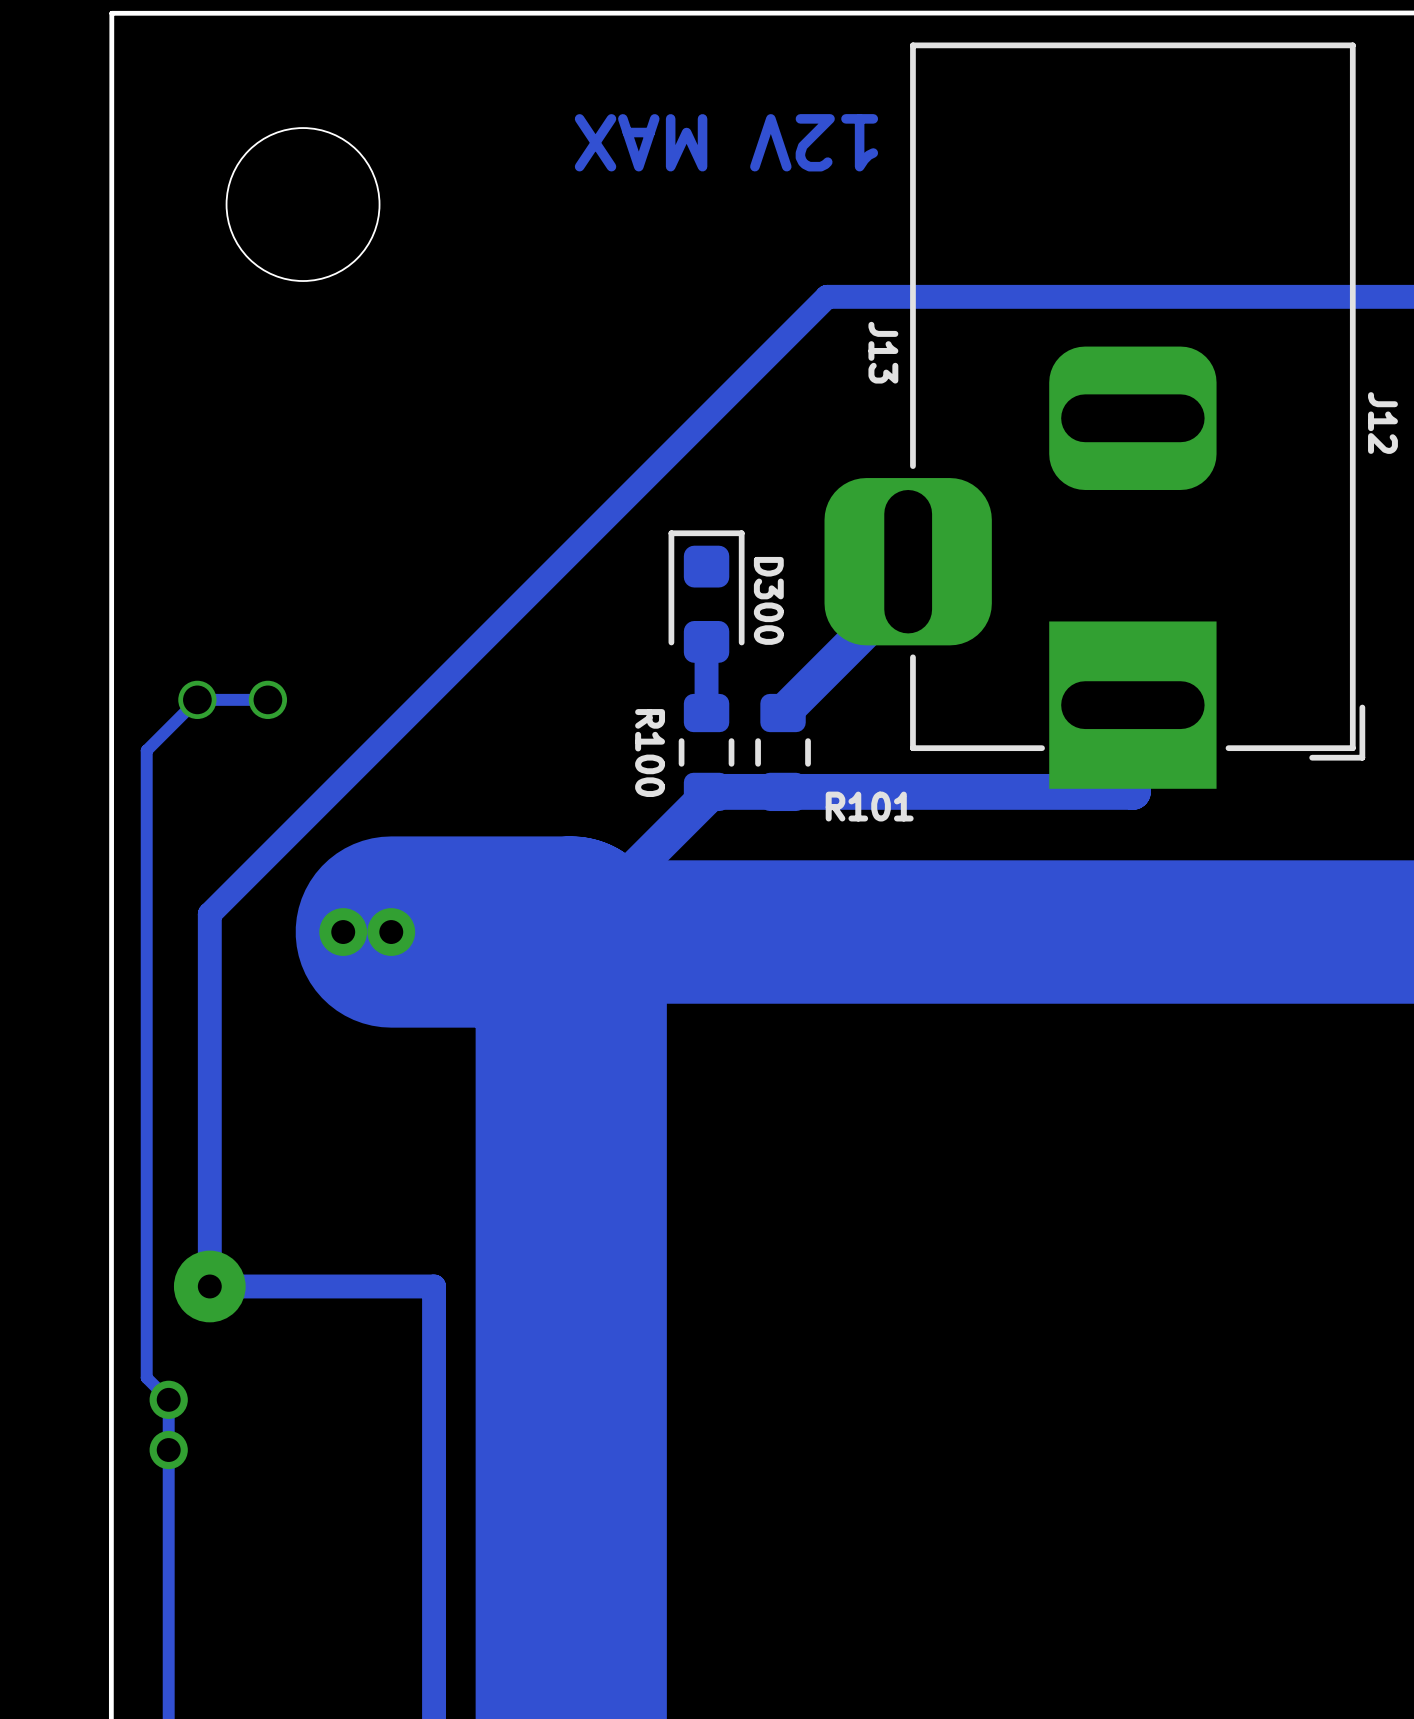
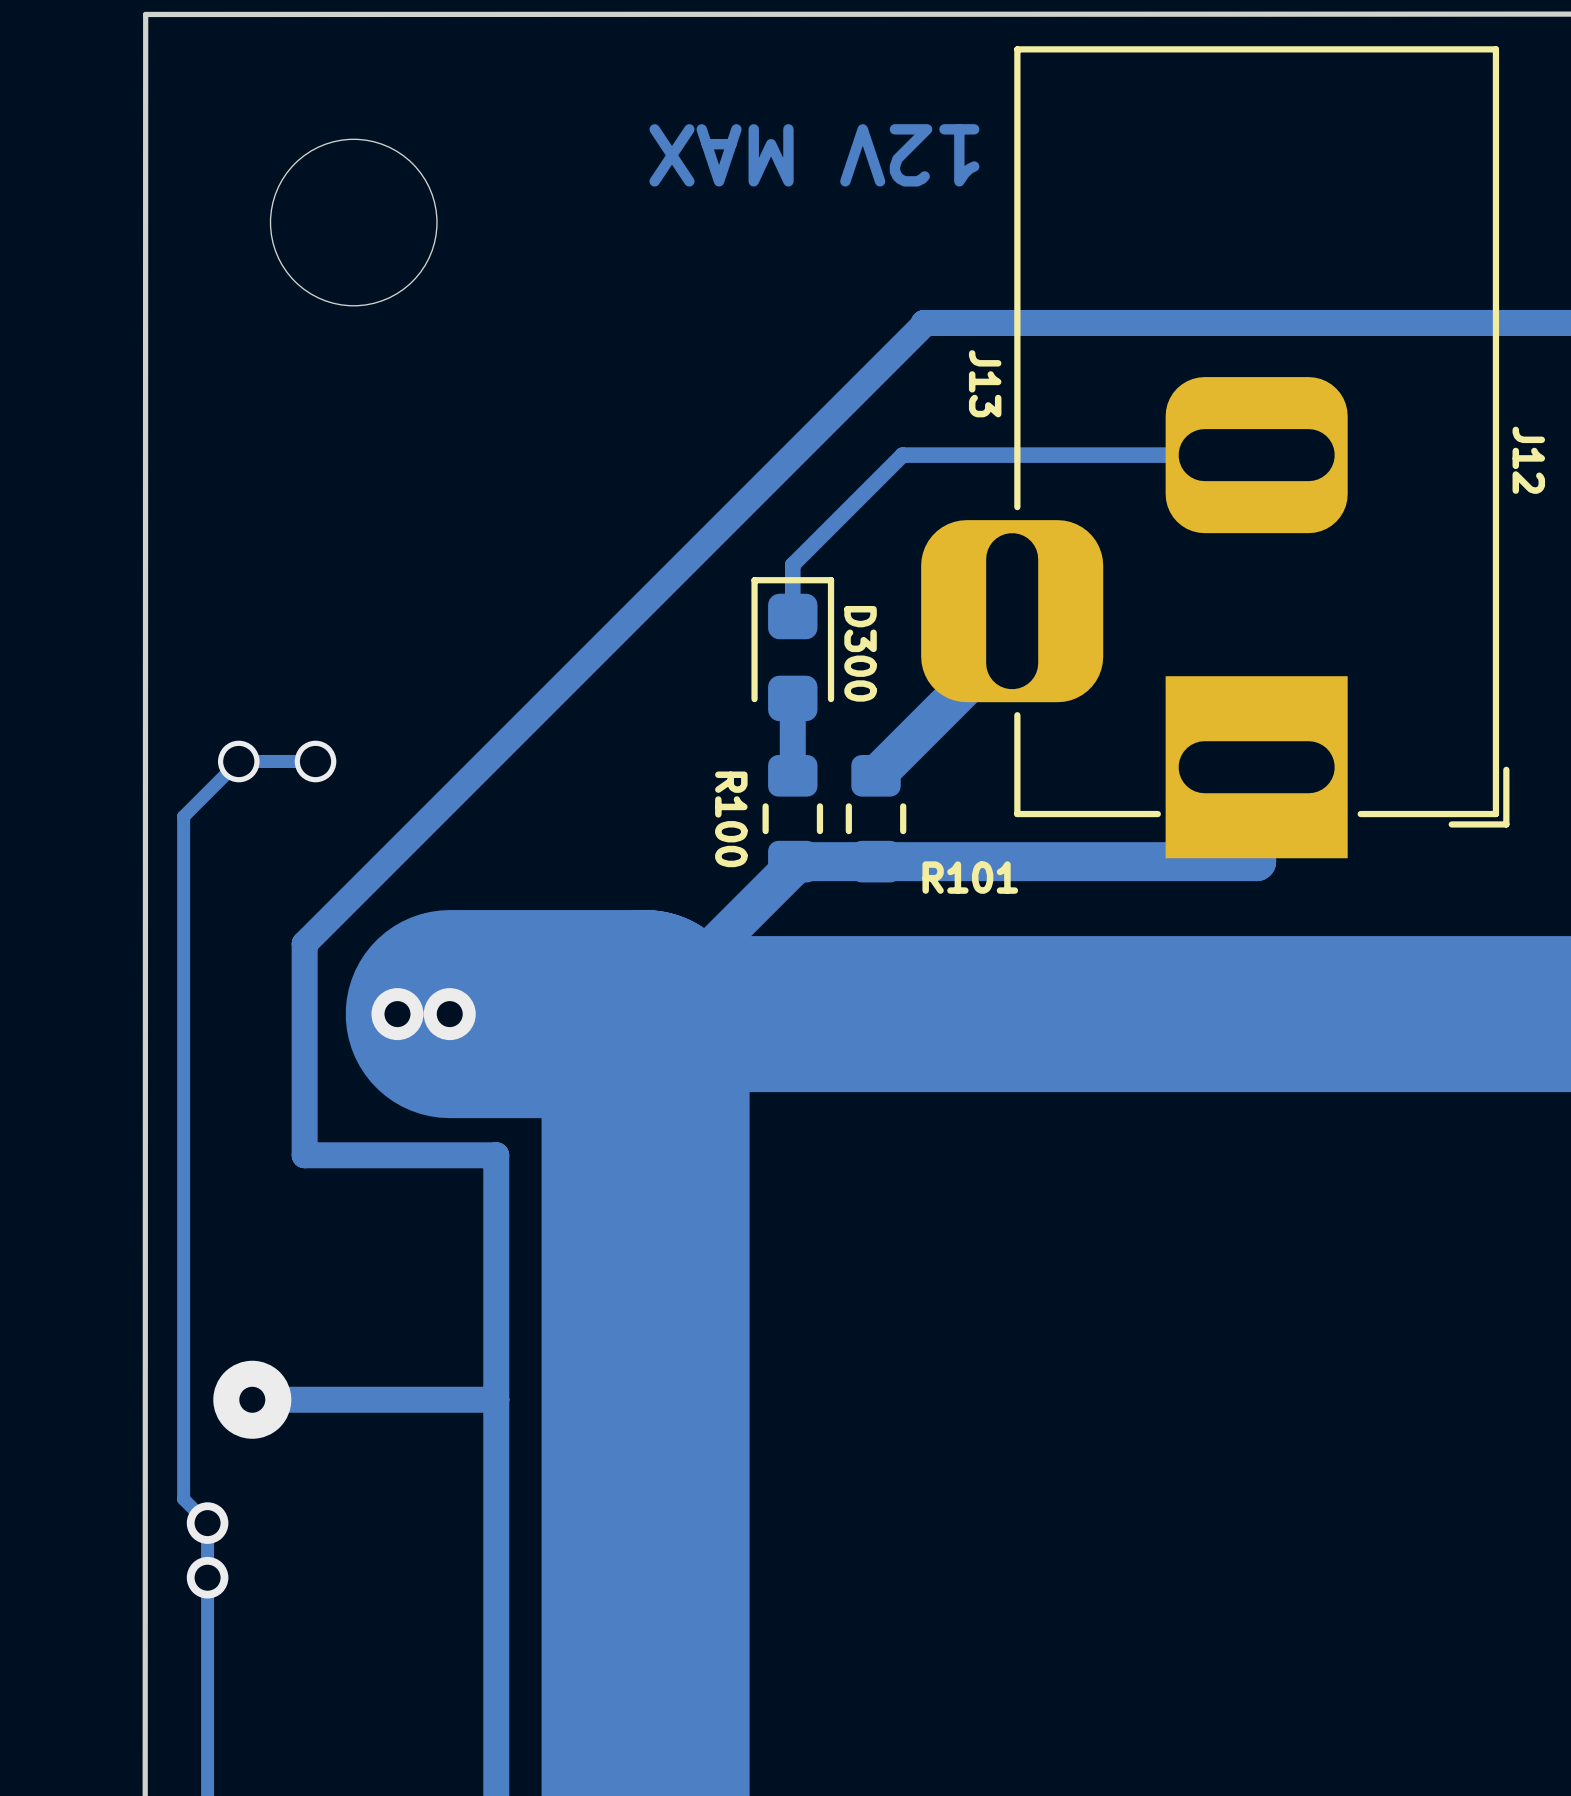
track: (827, 296) (209, 914) (209, 1286) -> (923, 322) (304, 943) (304, 1155) (496, 1155) (496, 1399)
track: none -> (1256, 455) (902, 455) (792, 564) (792, 616)

